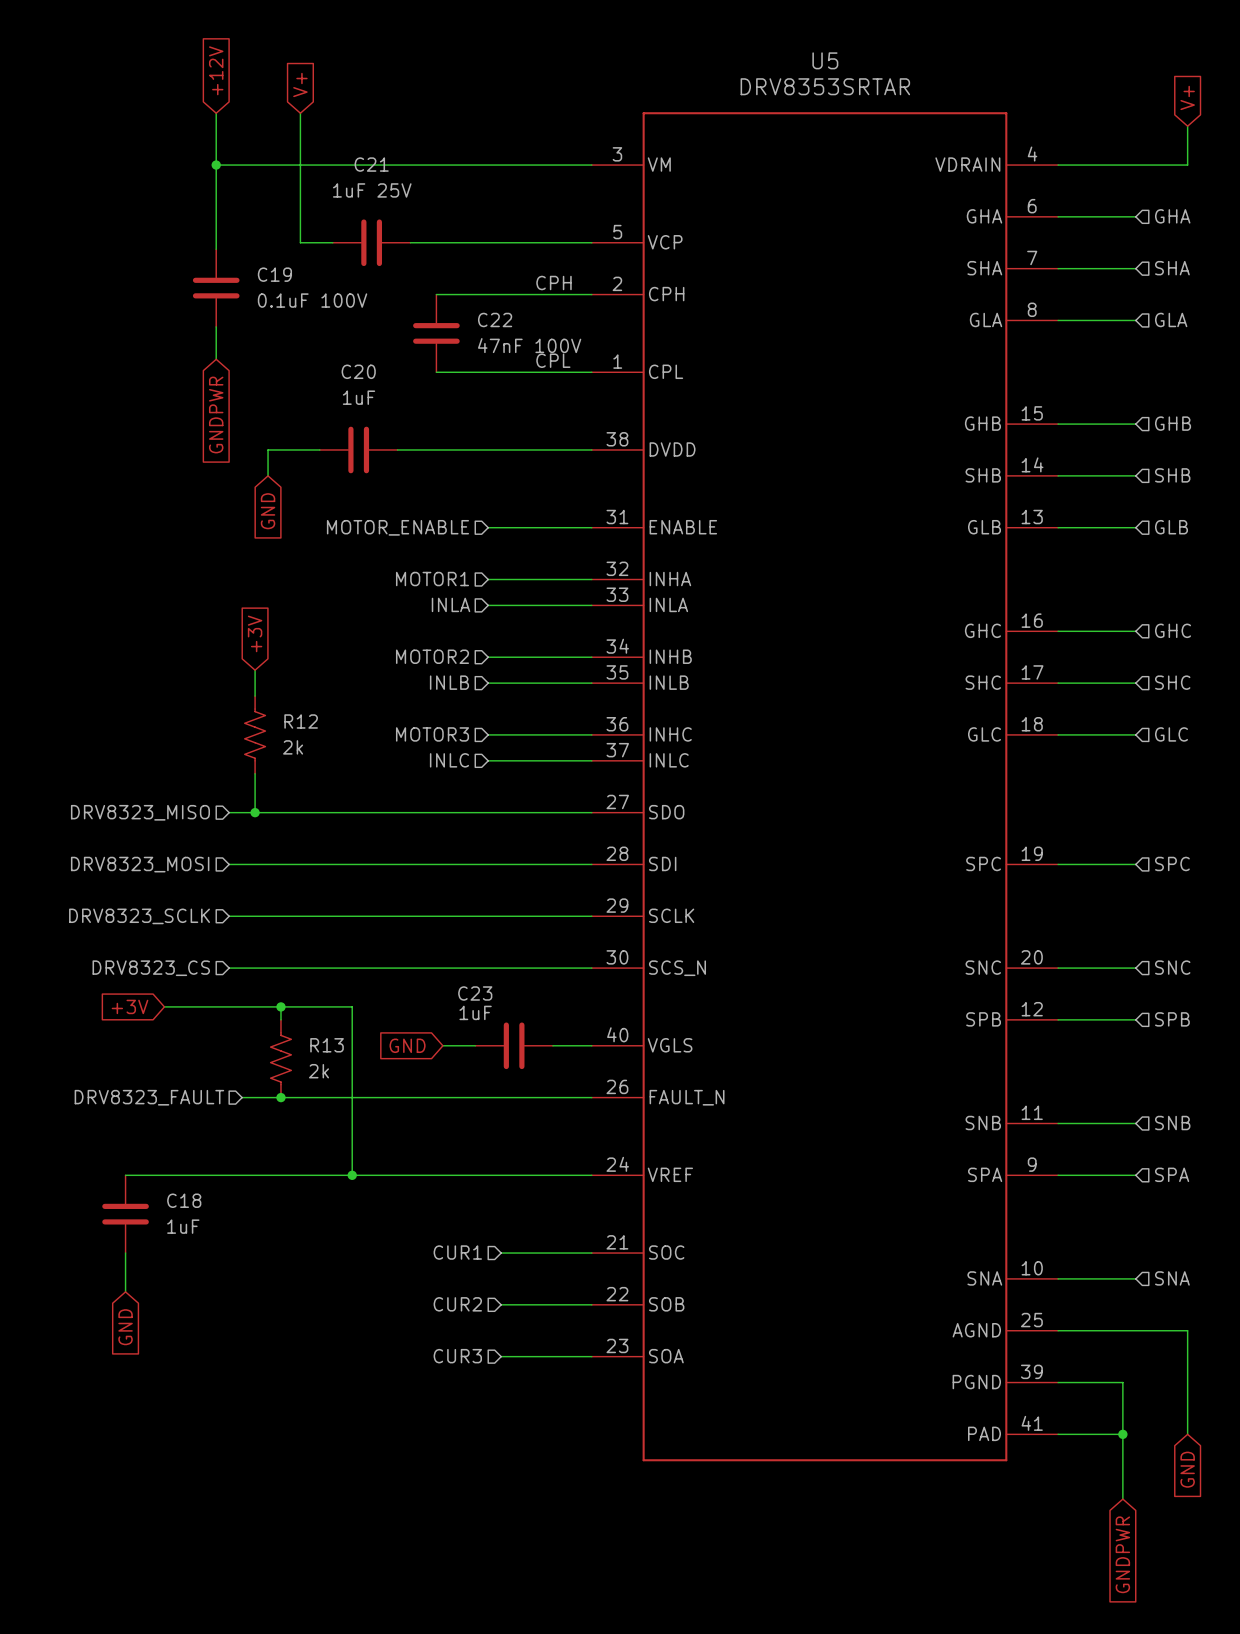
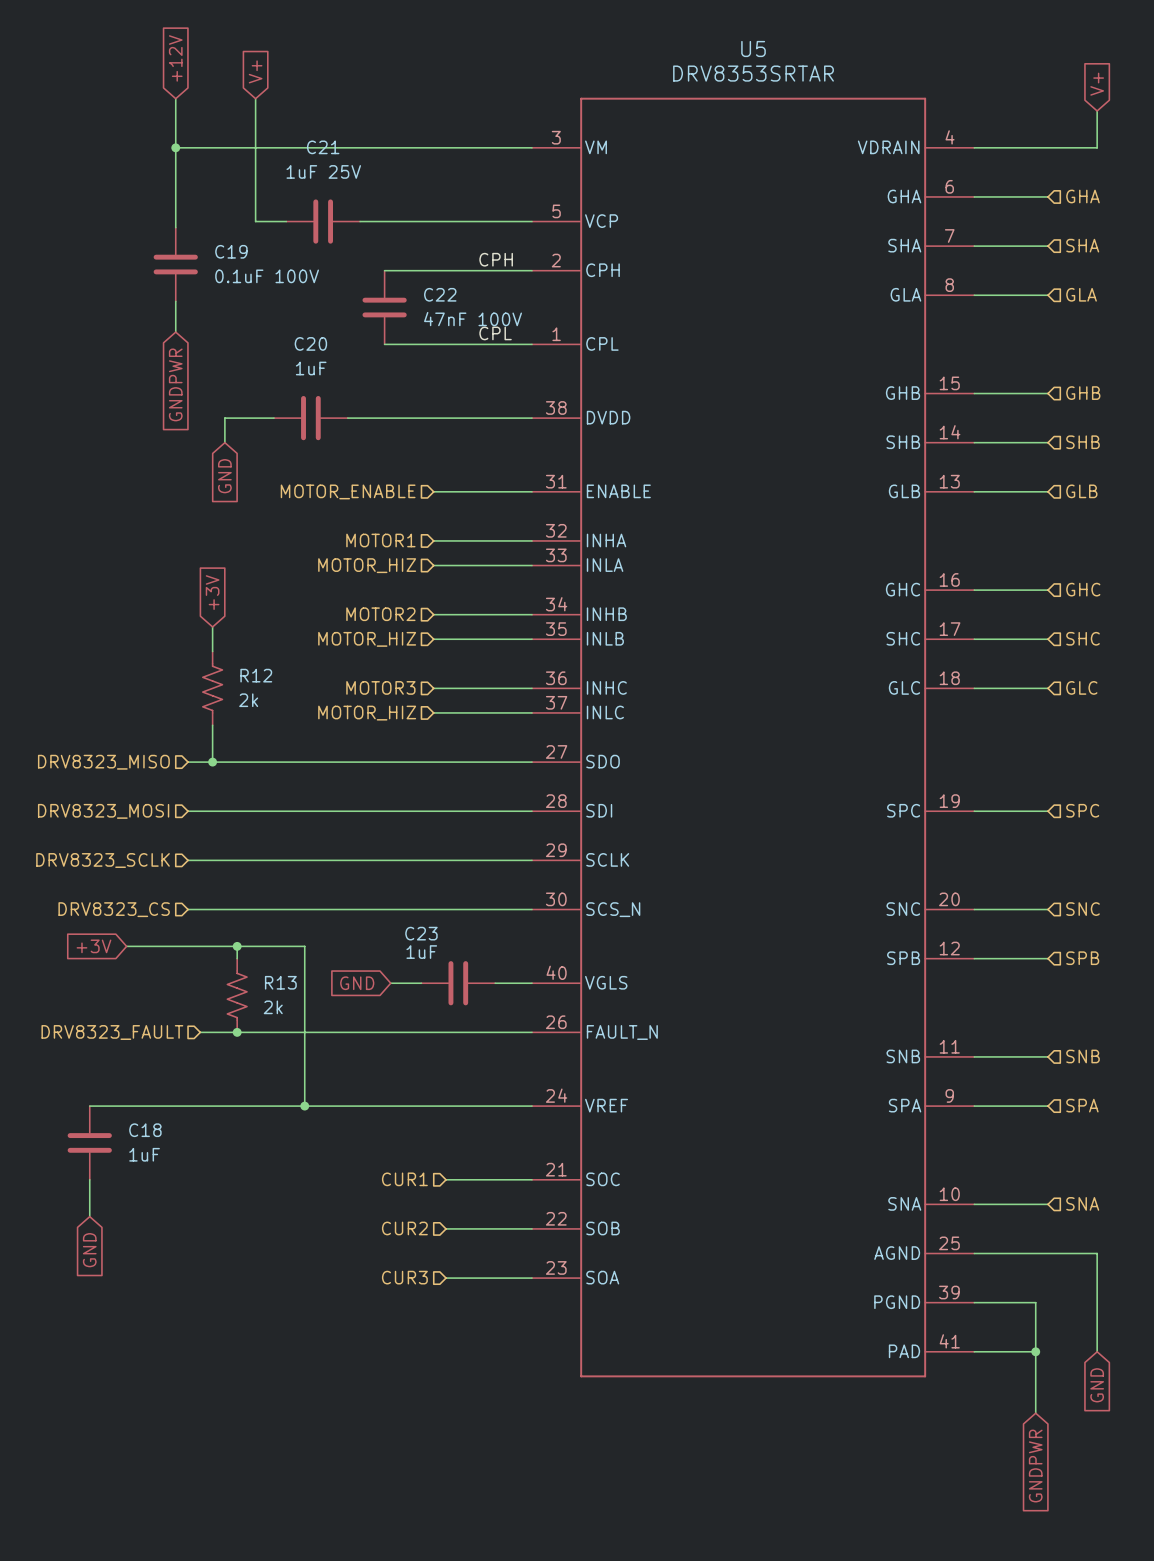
hierarchical label: INLA (451, 604) -> MOTOR_HIZ (367, 565)
hierarchical label: INLB (449, 682) -> MOTOR_HIZ (367, 639)
hierarchical label: INLC (449, 760) -> MOTOR_HIZ (367, 713)

